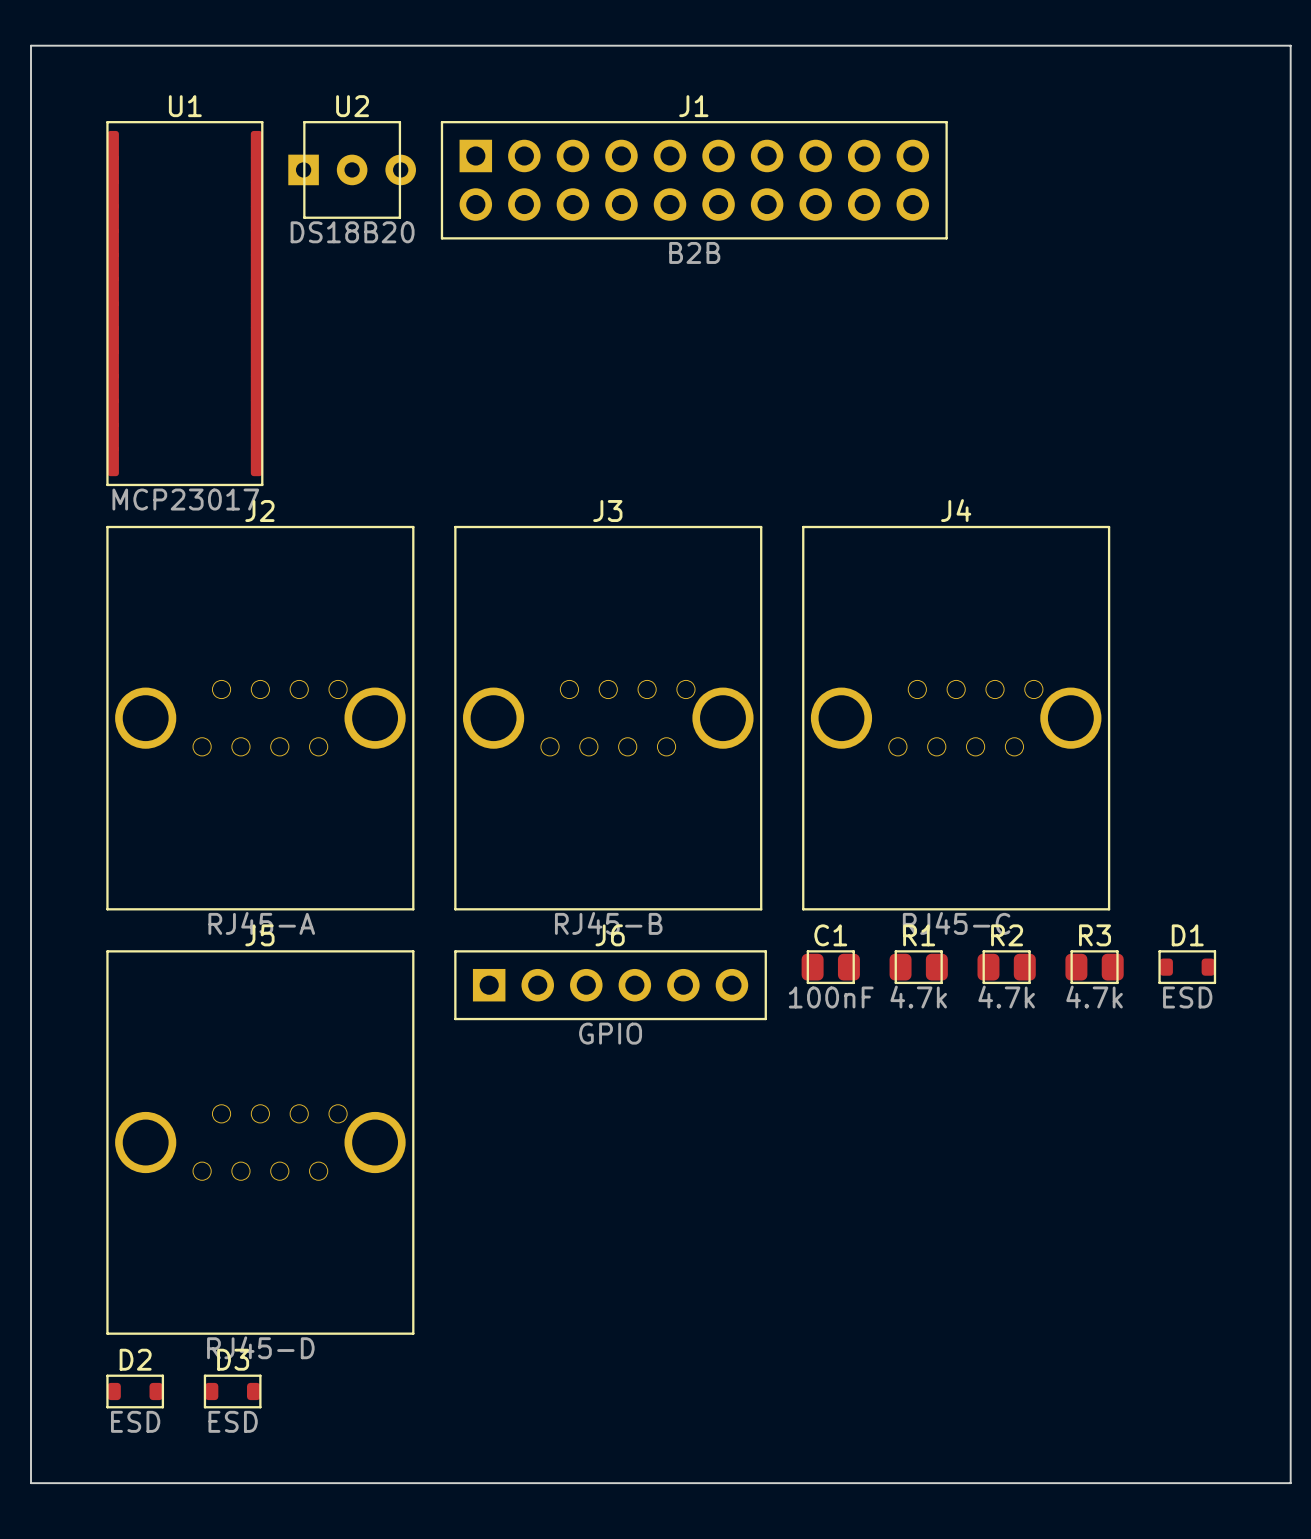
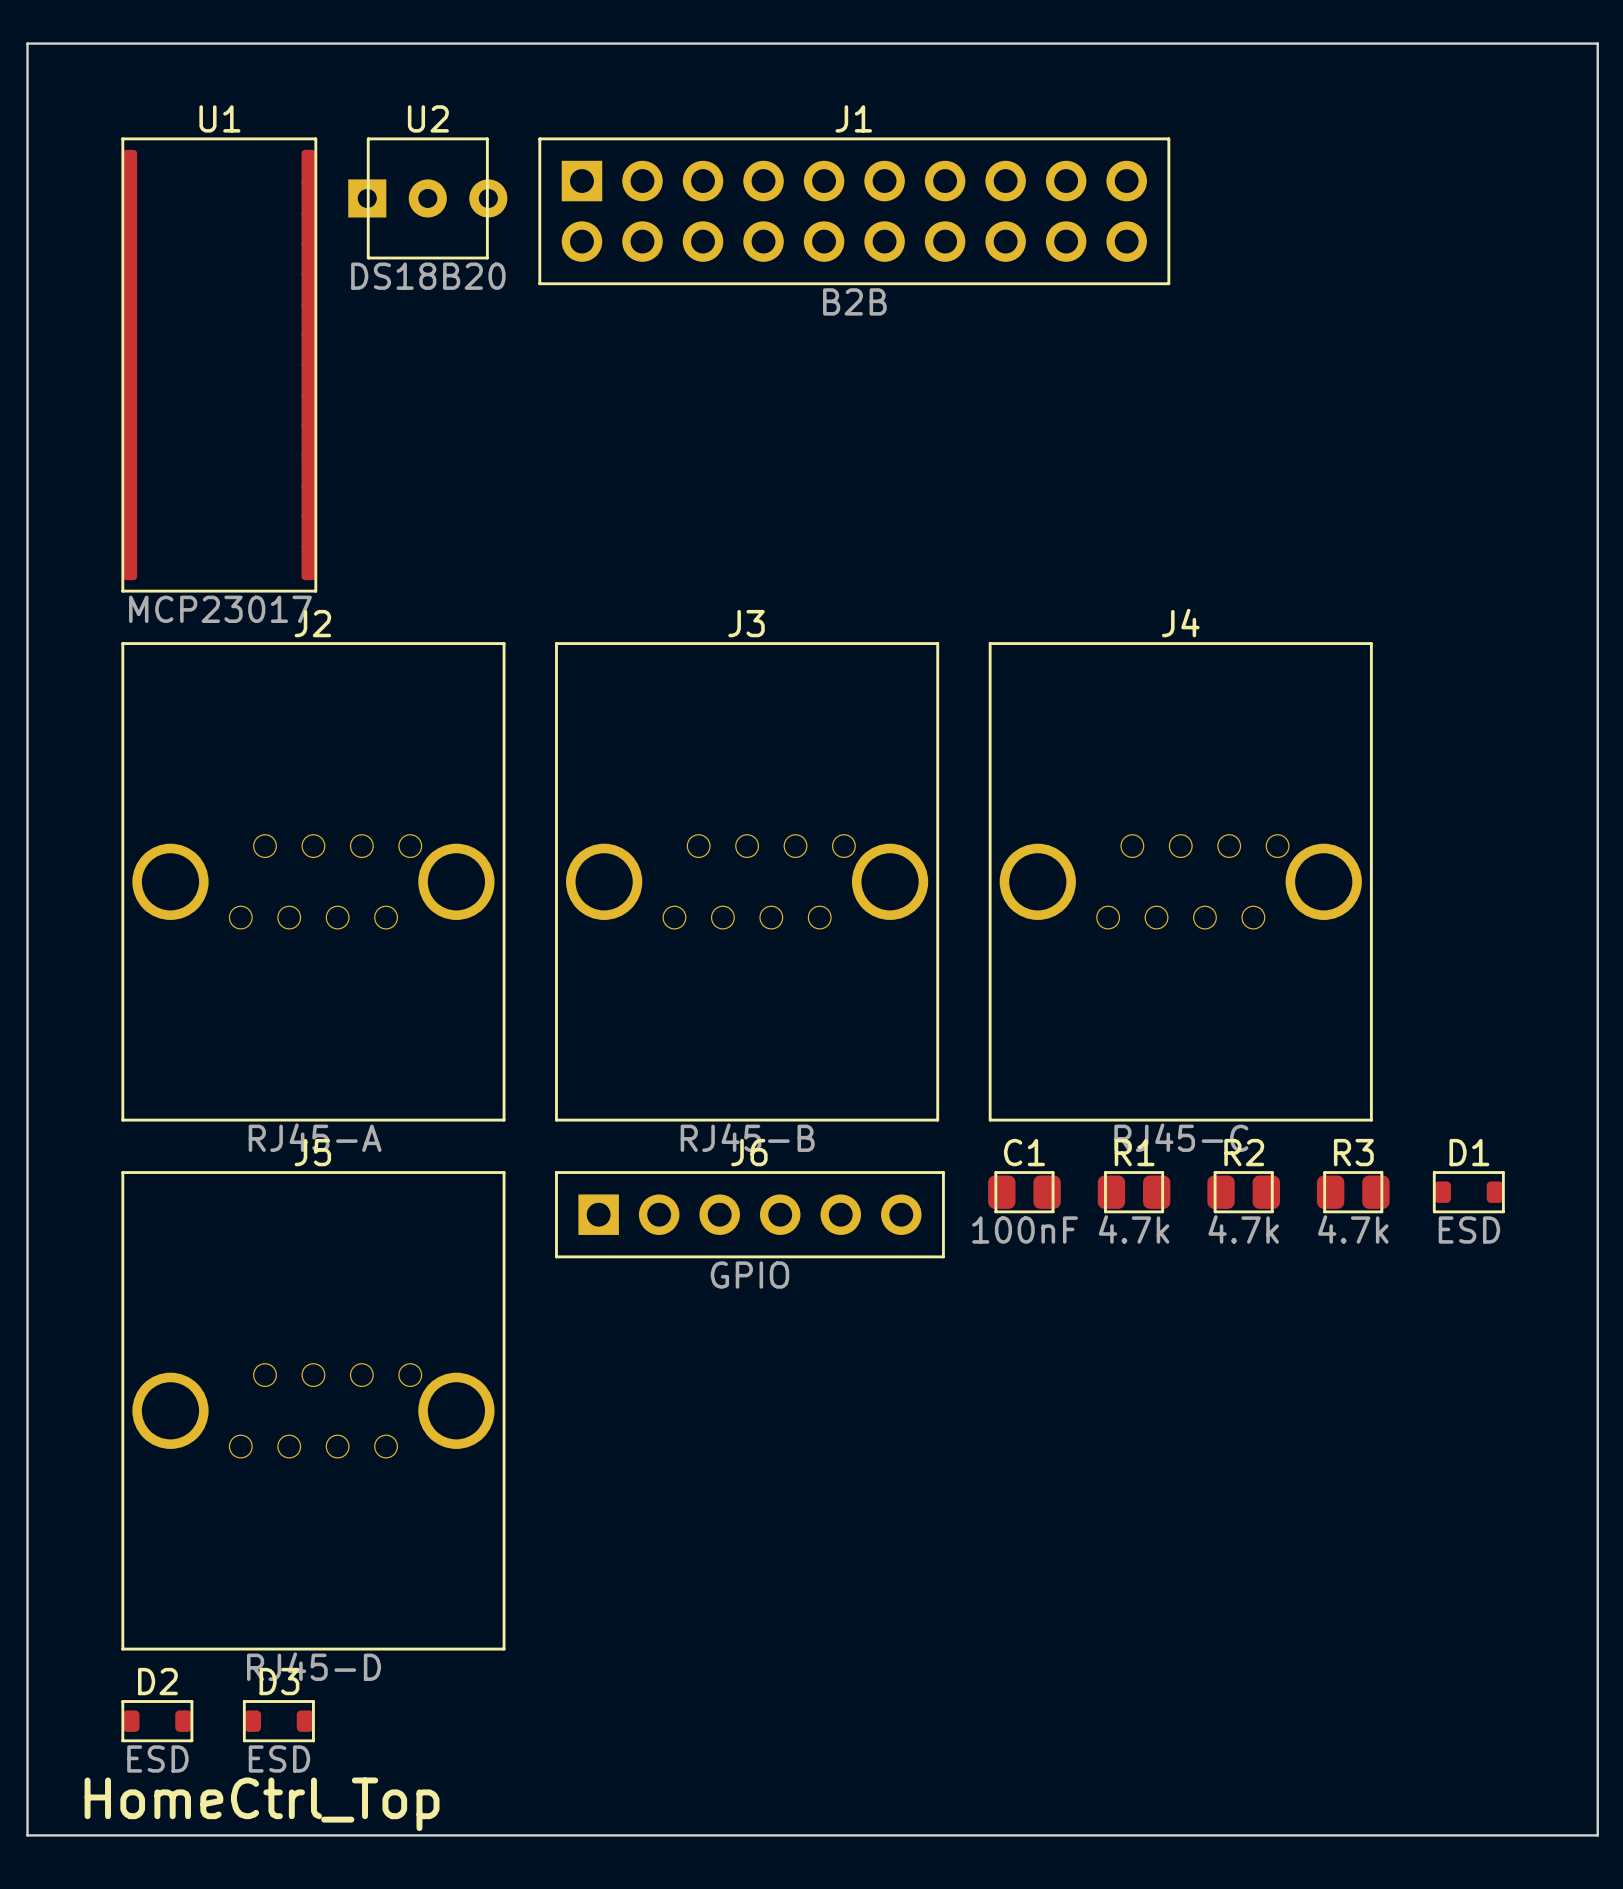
text: none -> HomeCtrl_Top (262, 1804)

